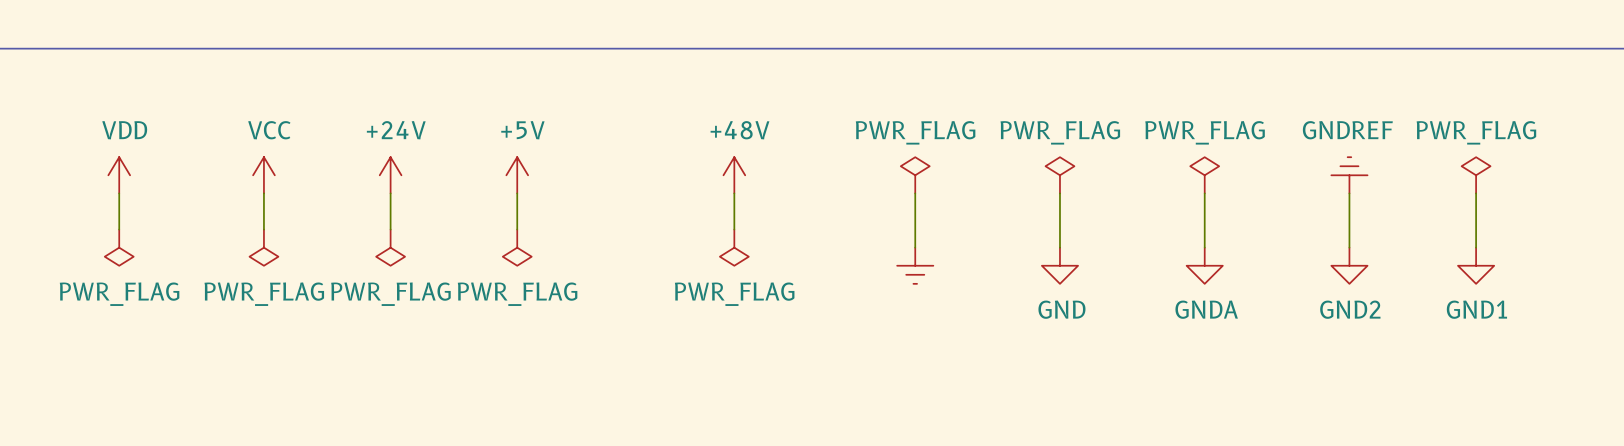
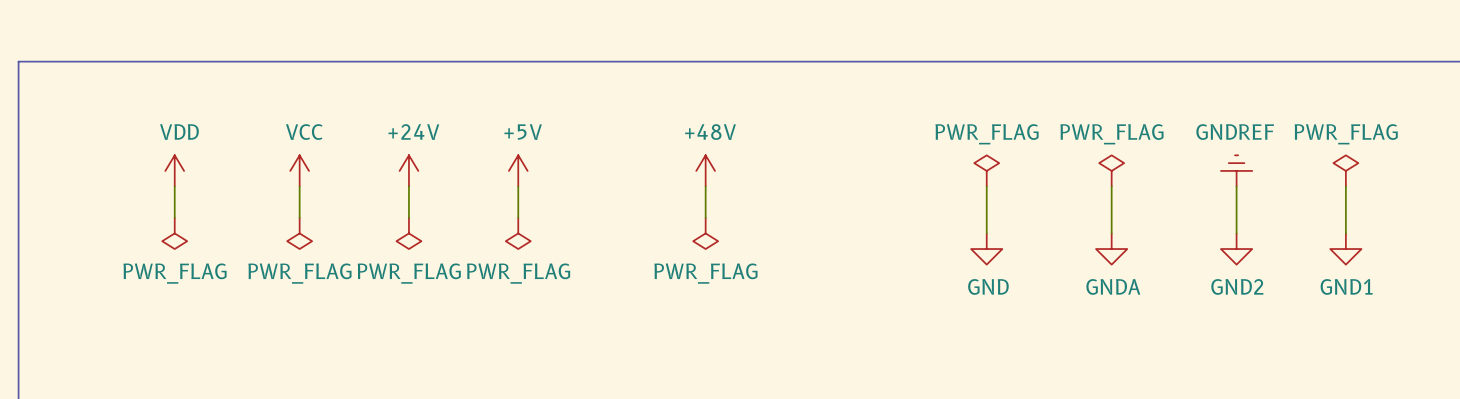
power symbol: PWR_FLAG (915, 175) -> none
wire: (915, 193) (915, 247) -> none
power symbol: (915, 265) -> none

